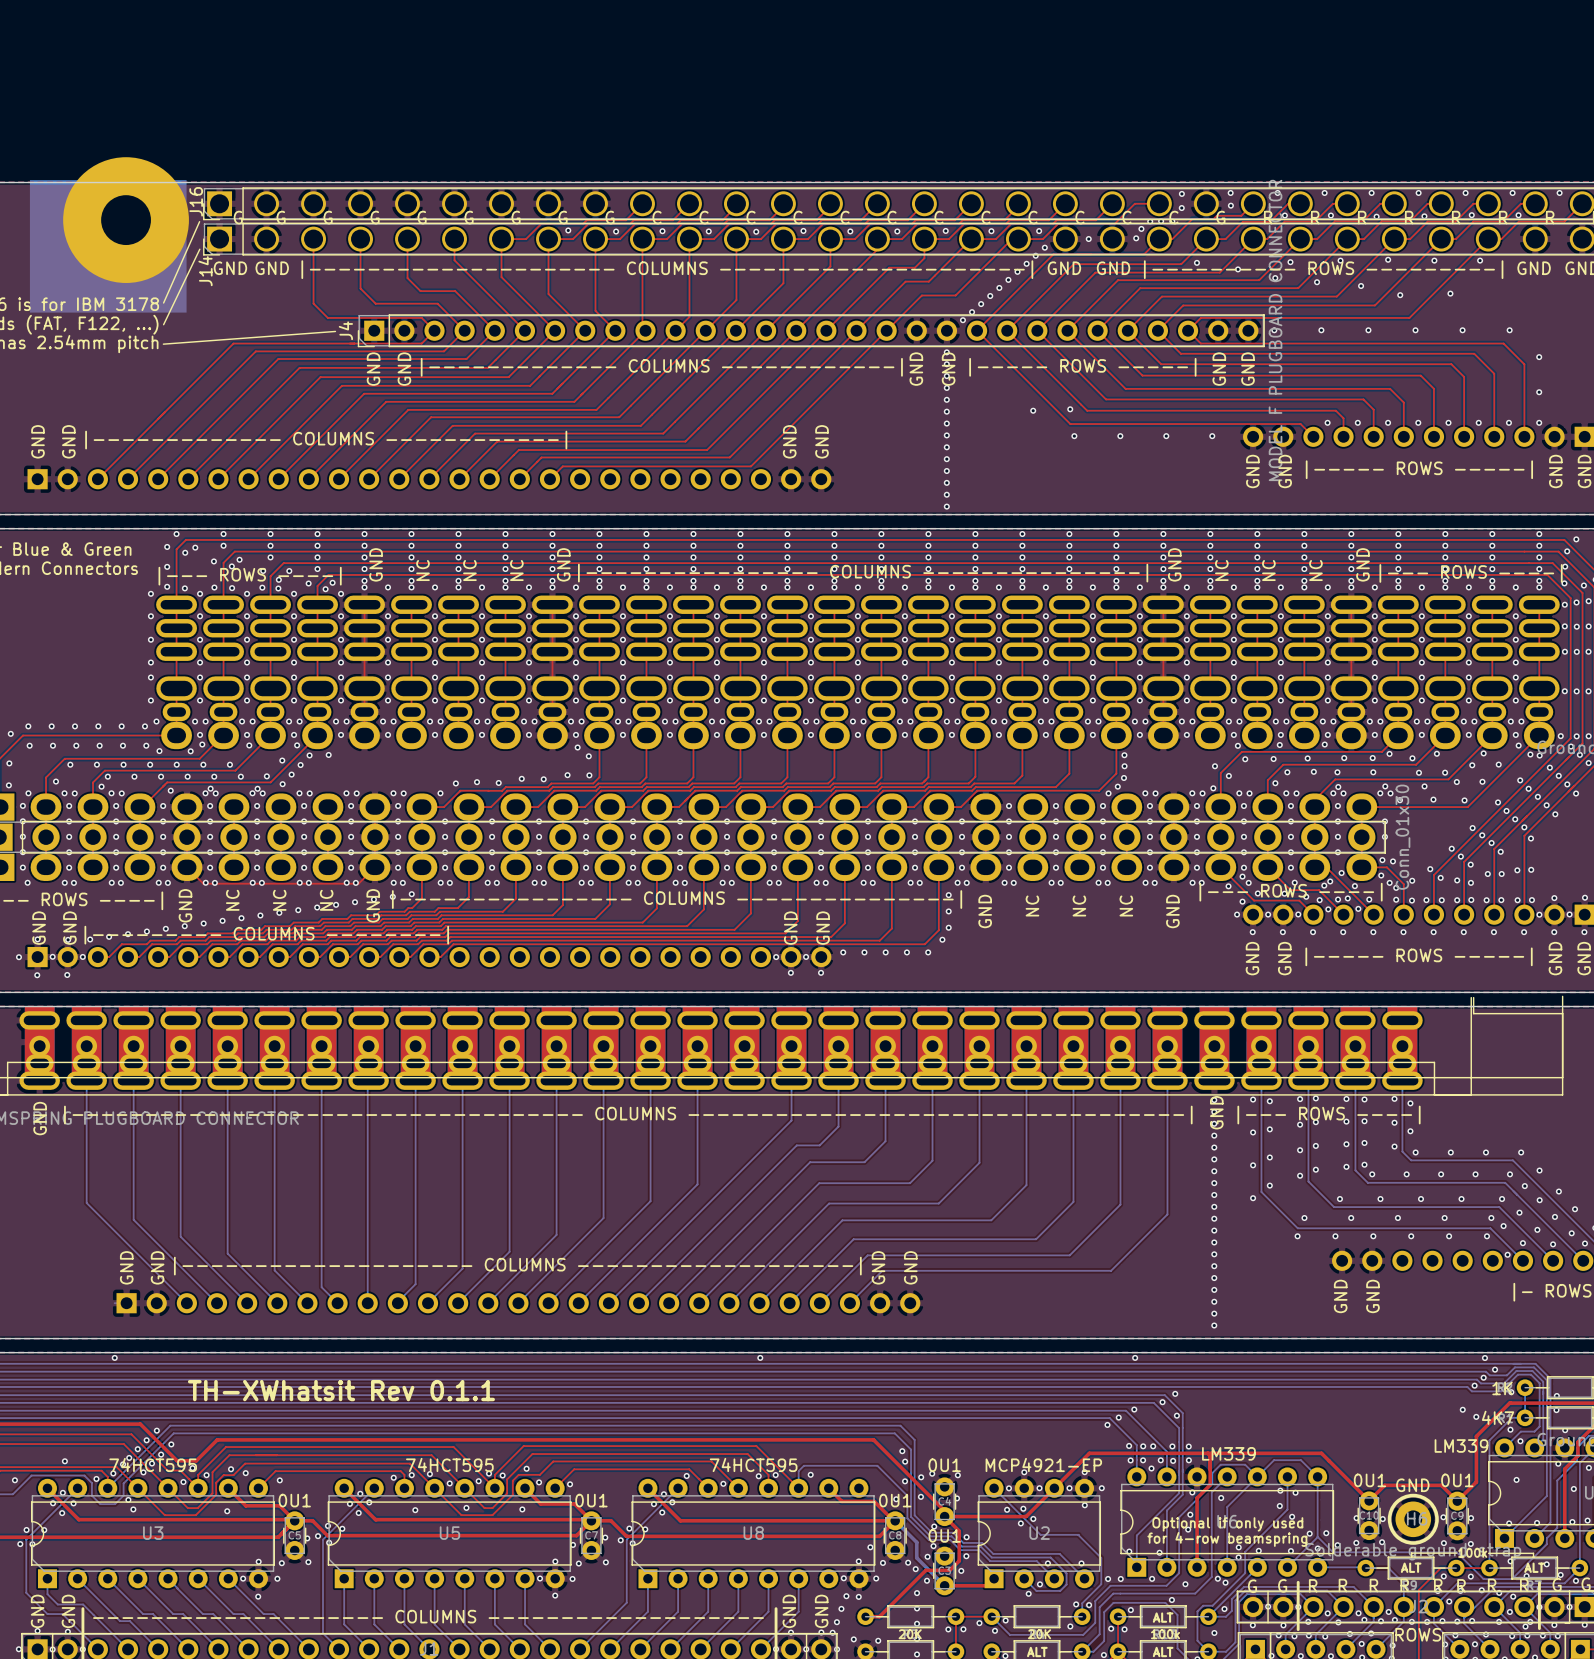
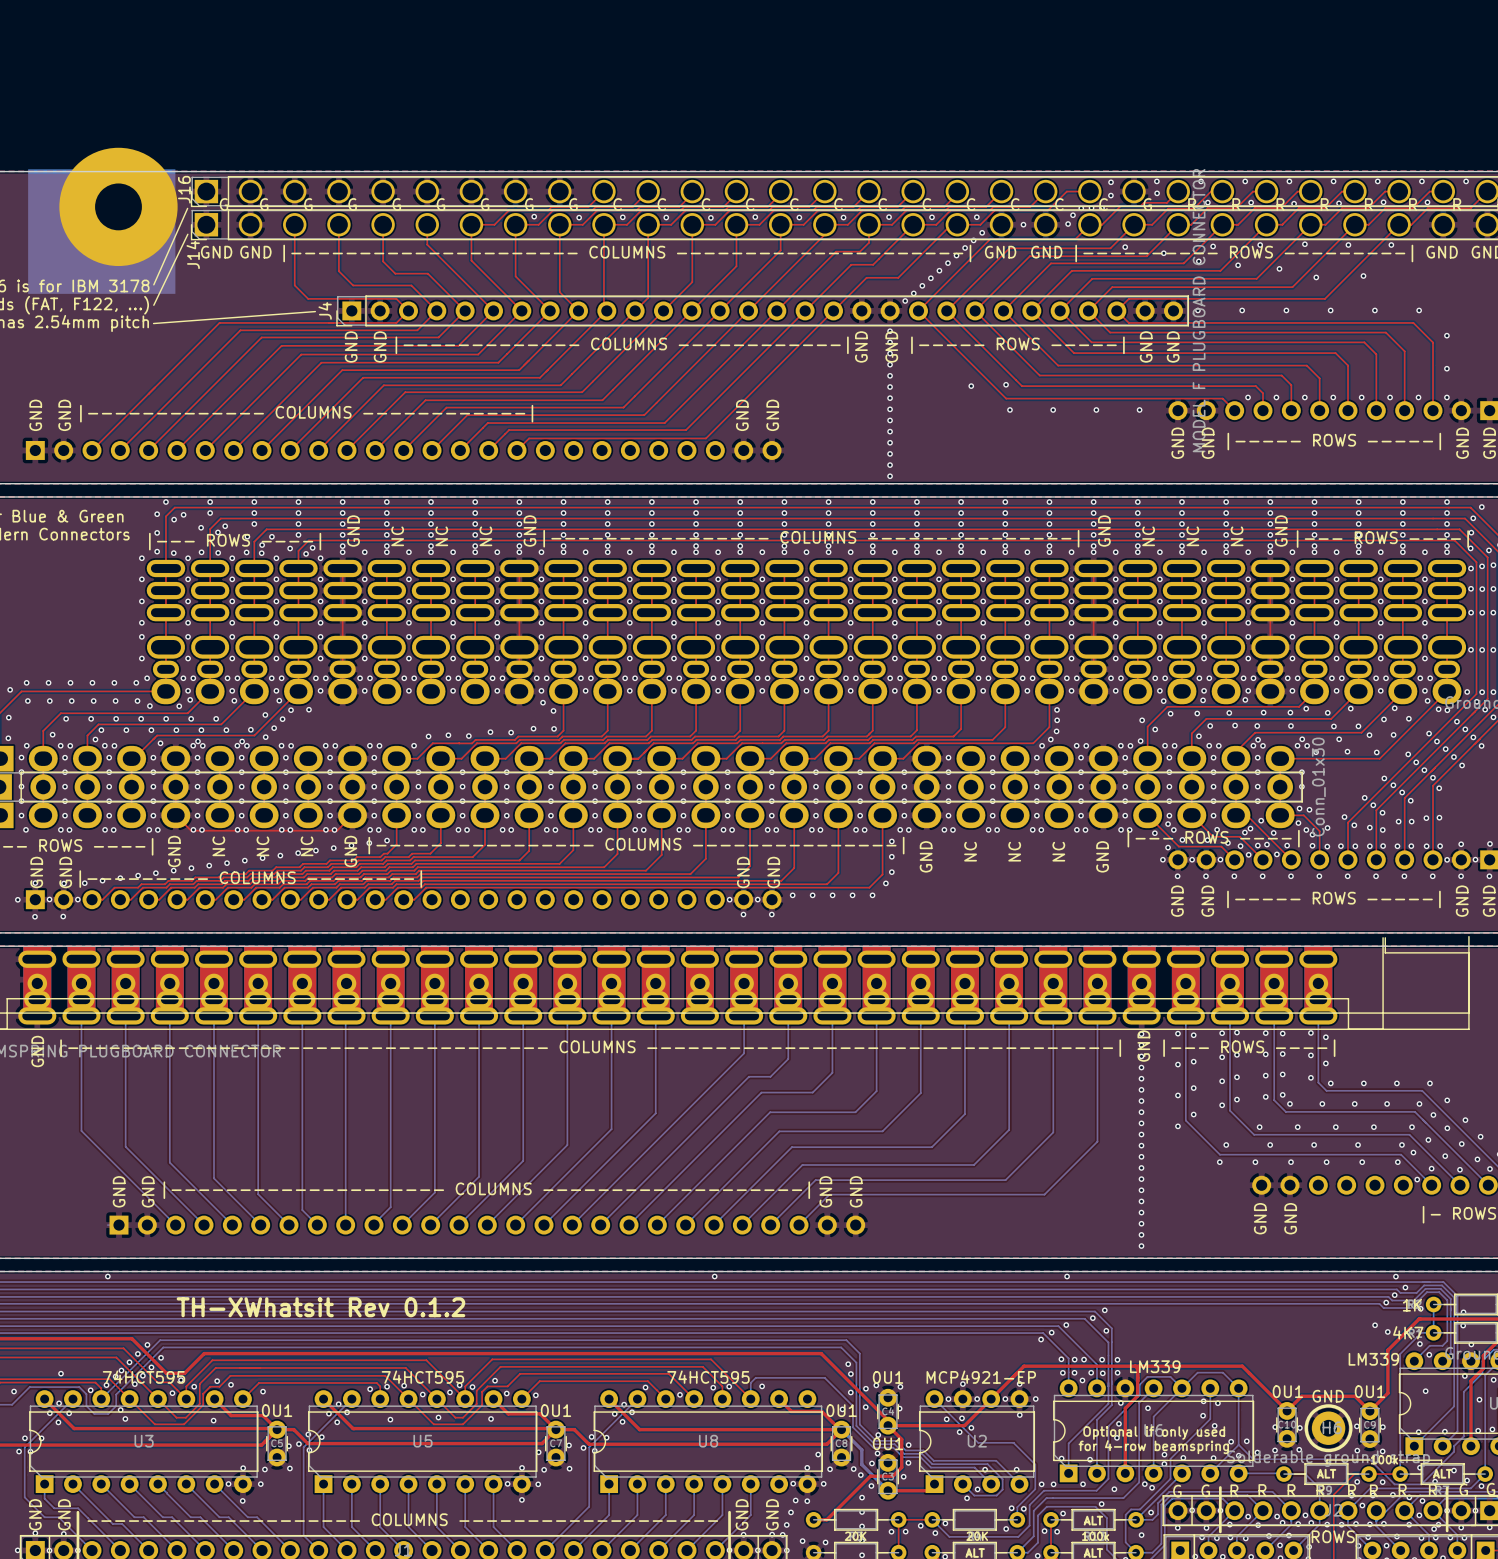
text: TH-XWhatsit Rev 0.1.1 (341, 1390) -> TH-XWhatsit Rev 0.1.2 (320, 1307)

